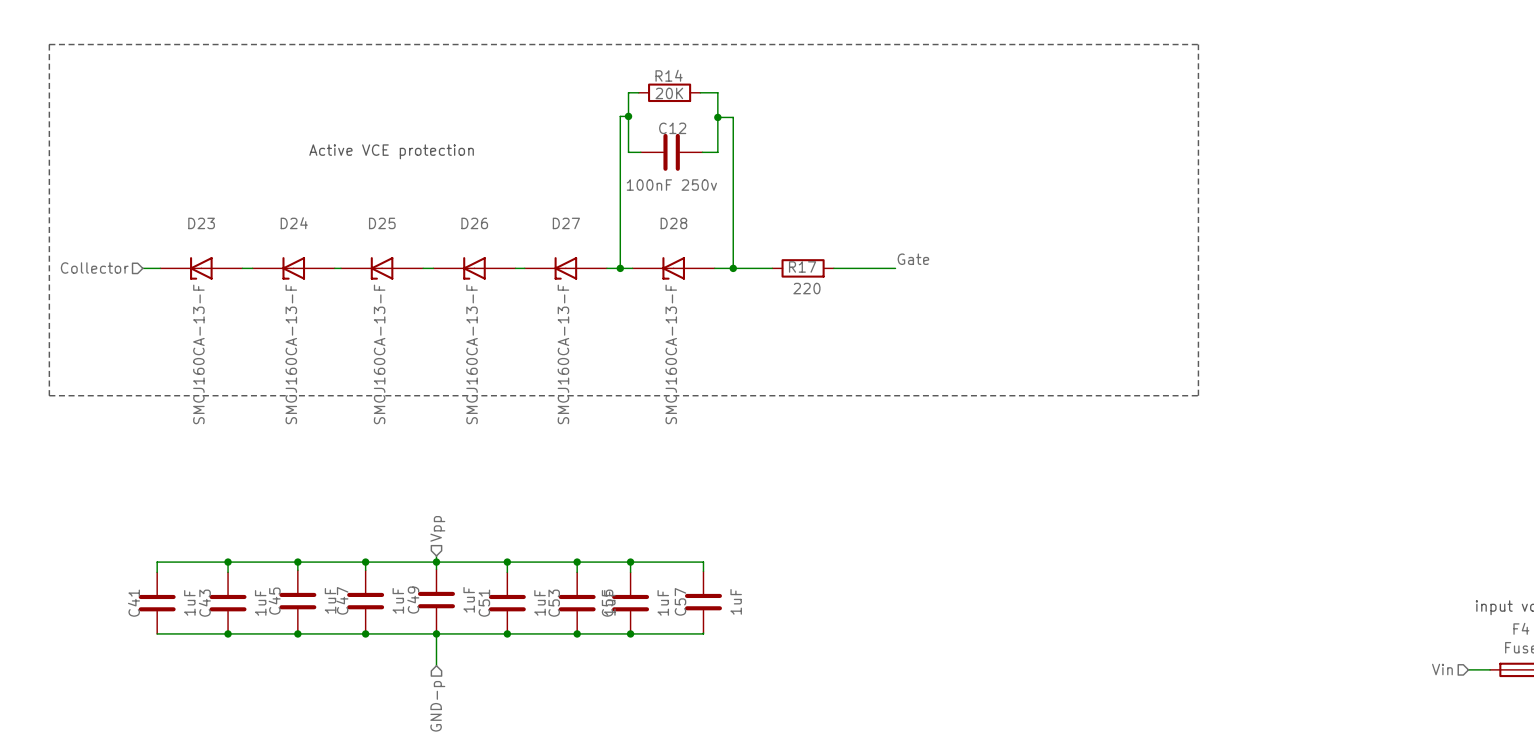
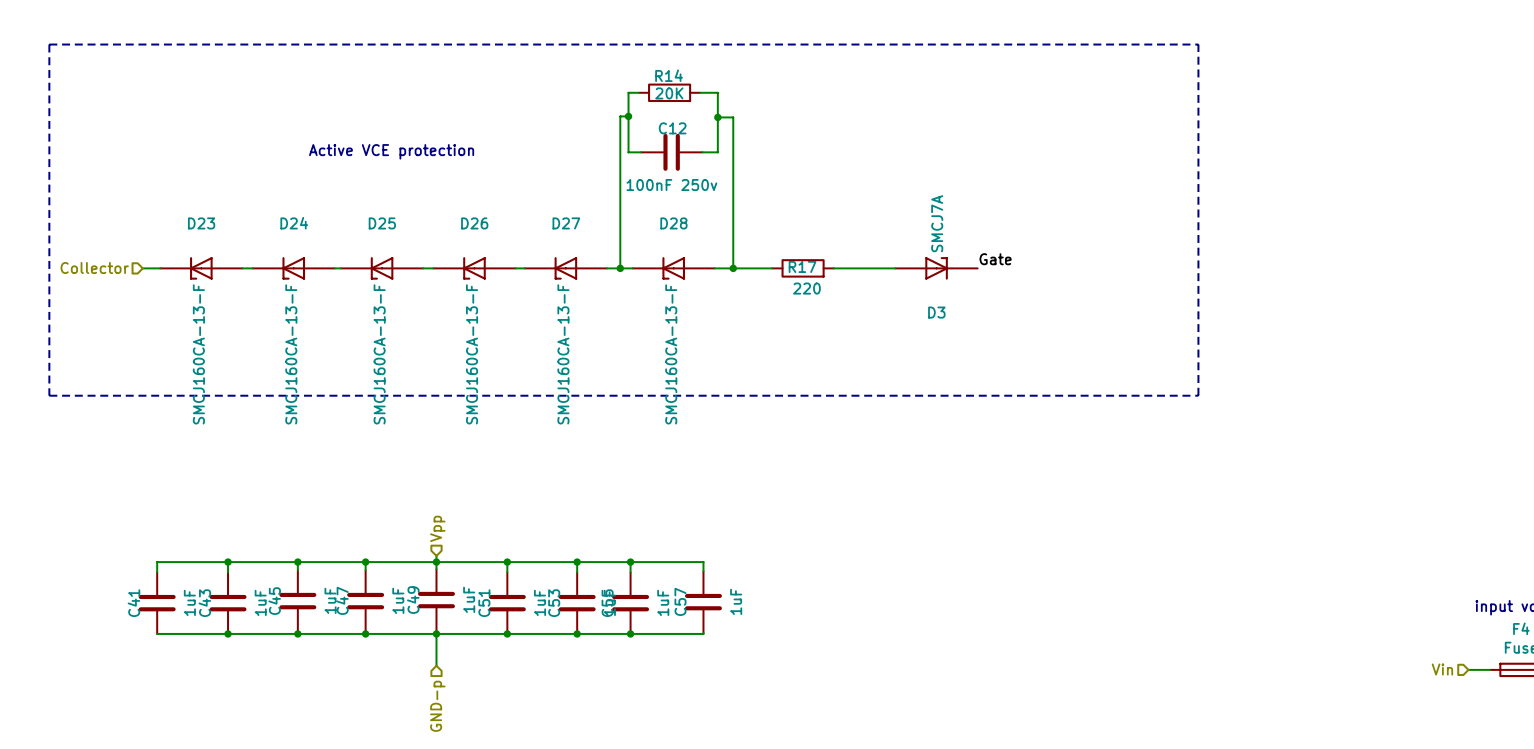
label position: Gate (913, 259) -> Gate (995, 259)
D3: none -> SMCJ7A (936, 268)

